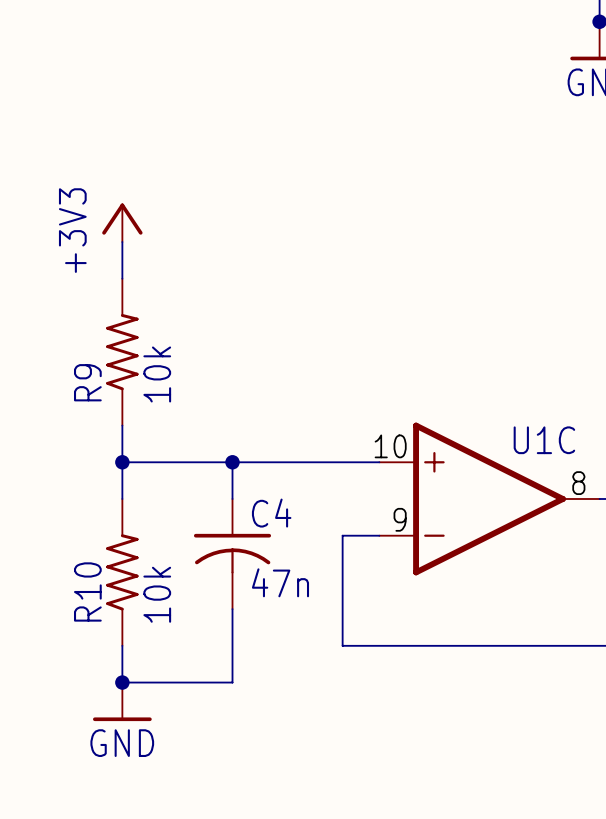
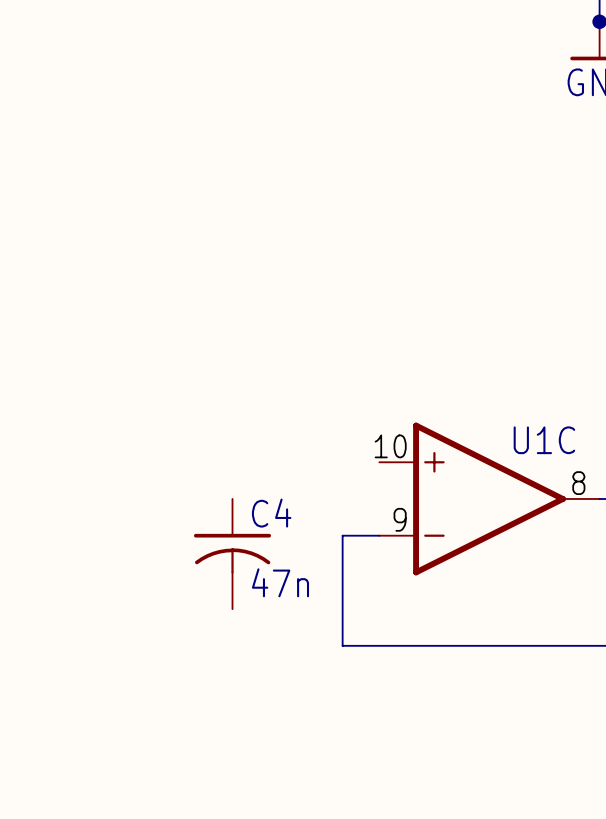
power symbol: +3V3 (122, 222) -> none
wire: (122, 242) (122, 278) -> none
R9: 10k (122, 352) -> none
wire: (122, 425) (122, 498) -> none
wire: (122, 462) (379, 462) -> none
junction: (122, 462) -> none
wire: (232, 462) (232, 498) -> none
junction: (232, 462) -> none
R10: 10k (122, 572) -> none
wire: (232, 609) (232, 682) (122, 682) (122, 645) -> none
junction: (122, 682) -> none
power symbol: GND (122, 701) -> none

